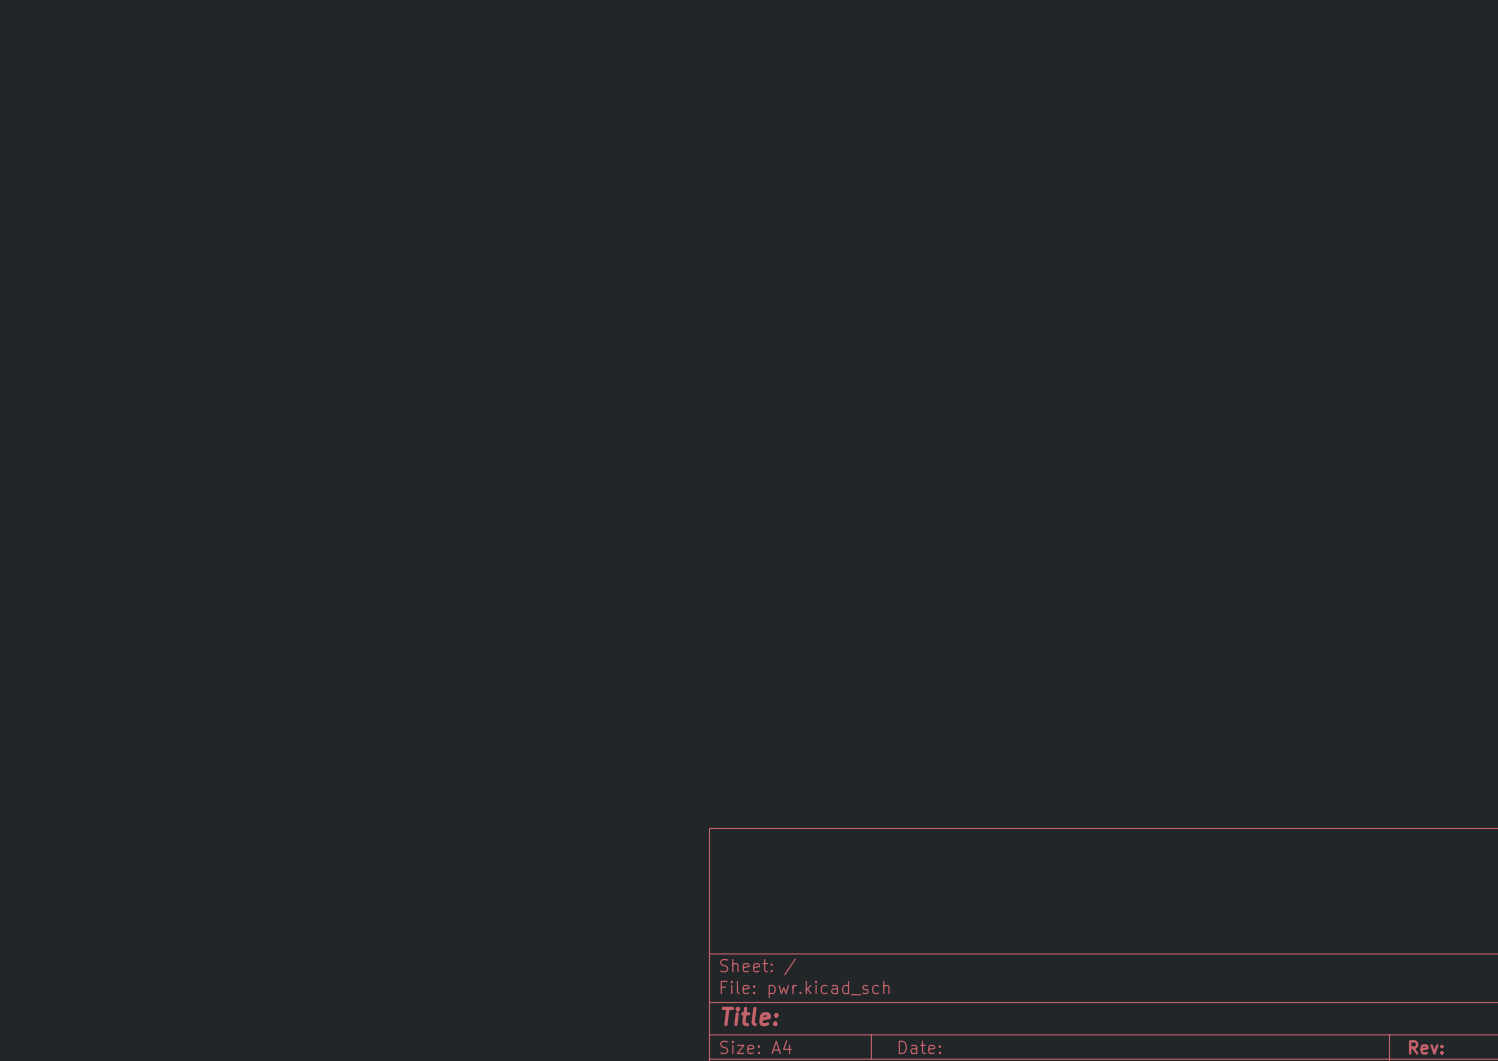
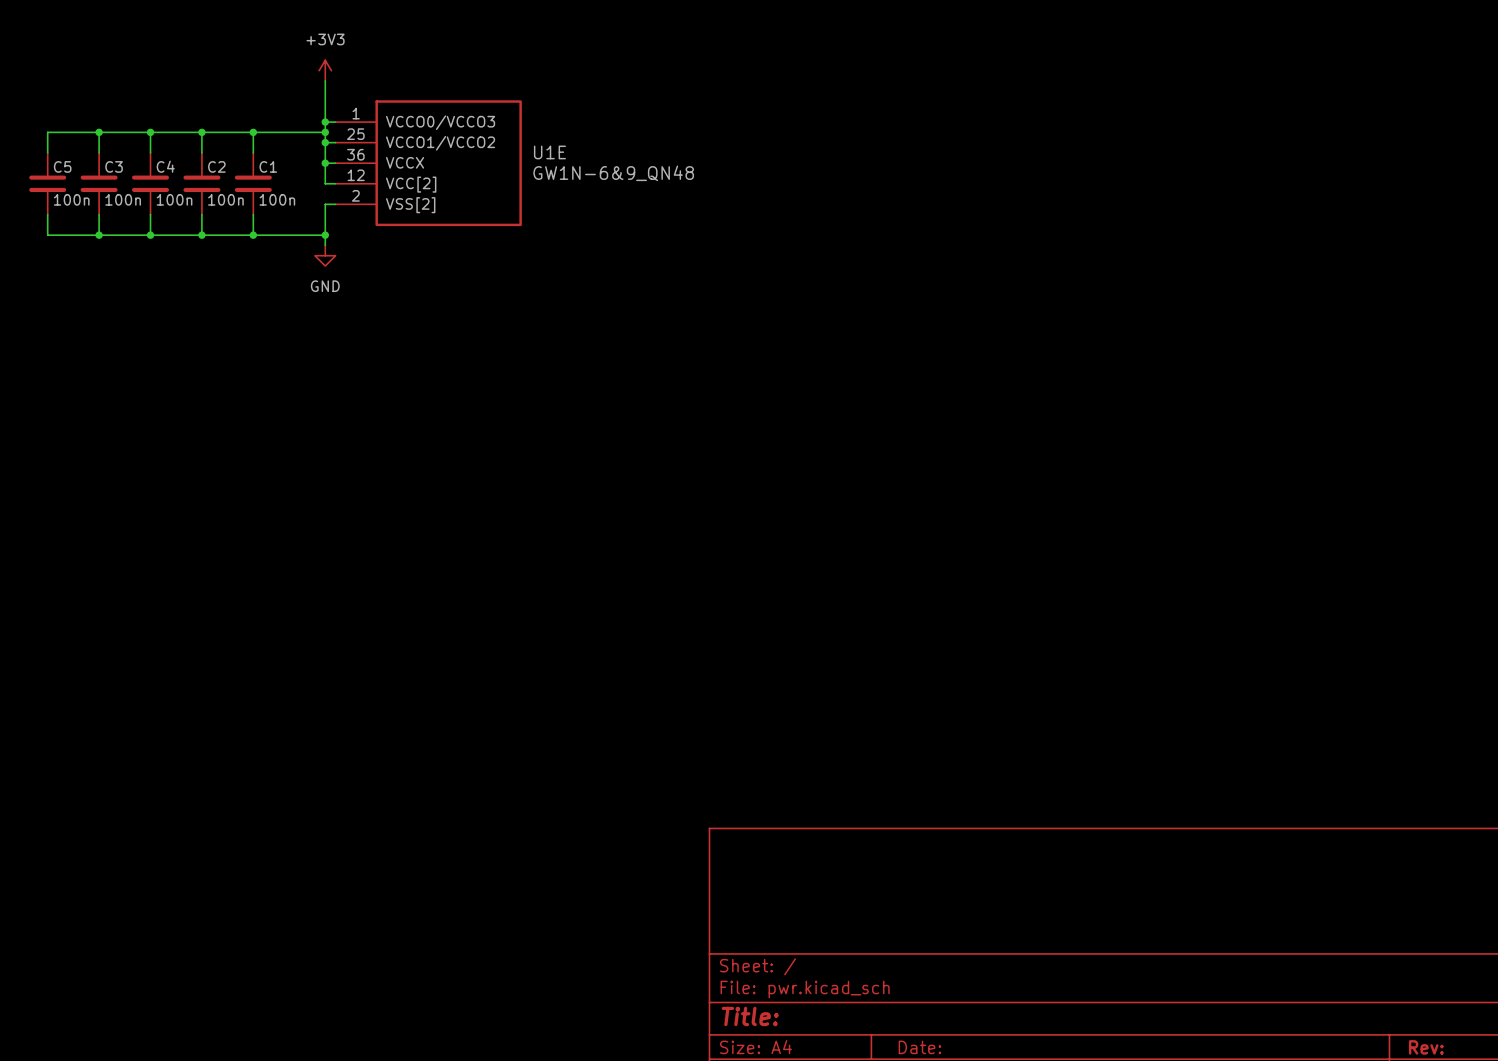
power symbol: none -> +3V3 (325, 70)
wire: none -> (325, 80) (325, 183) (335, 183)
wire: none -> (325, 122) (335, 122)
junction: none -> (325, 122)
wire: none -> (99, 132) (99, 152)
junction: none -> (99, 132)
wire: none -> (150, 132) (150, 152)
junction: none -> (150, 132)
wire: none -> (201, 132) (201, 152)
junction: none -> (201, 132)
wire: none -> (253, 132) (253, 152)
junction: none -> (253, 132)
wire: none -> (325, 132) (47, 132) (47, 152)
junction: none -> (325, 132)
wire: none -> (325, 142) (335, 142)
junction: none -> (325, 142)
wire: none -> (325, 163) (335, 163)
junction: none -> (325, 163)
U1E: none -> GW1N-6&9_QN48 (428, 163)
C5: none -> 100n (47, 183)
C3: none -> 100n (99, 183)
C4: none -> 100n (150, 183)
C2: none -> 100n (201, 183)
C1: none -> 100n (253, 183)
wire: none -> (335, 204) (325, 204) (325, 245)
wire: none -> (47, 214) (47, 235) (325, 235)
wire: none -> (99, 214) (99, 235)
wire: none -> (150, 214) (150, 235)
wire: none -> (201, 214) (201, 235)
wire: none -> (253, 214) (253, 235)
junction: none -> (99, 235)
junction: none -> (150, 235)
junction: none -> (201, 235)
junction: none -> (253, 235)
junction: none -> (325, 235)
power symbol: none -> GND (325, 255)

